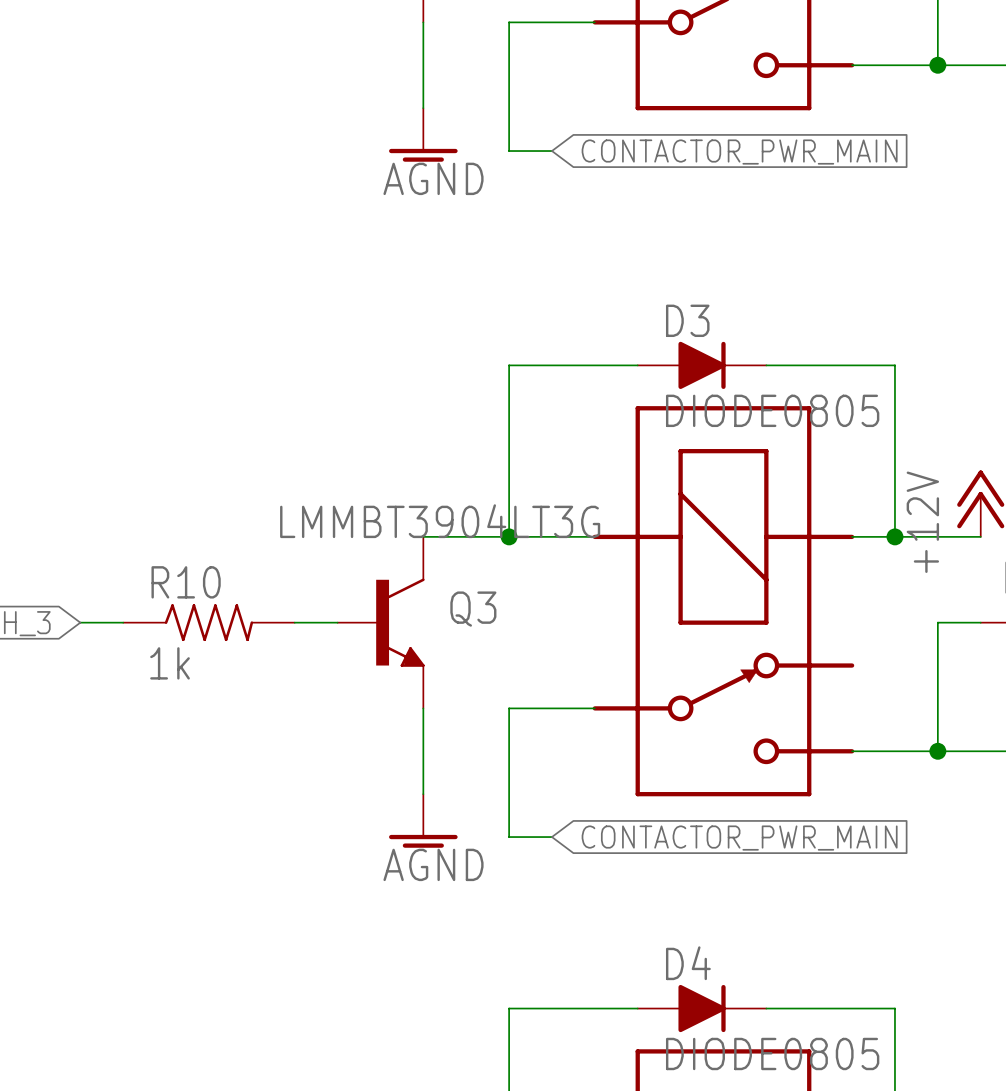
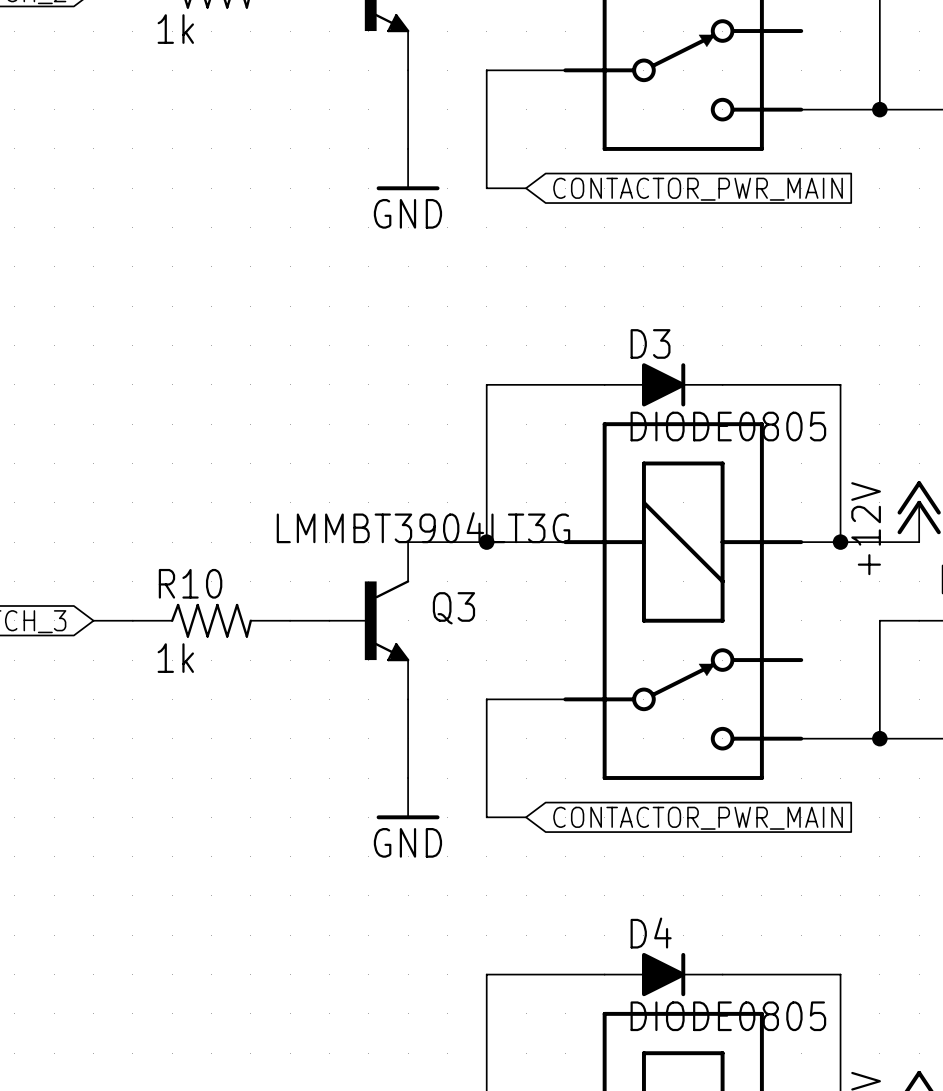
power symbol: AGND (423, 134) -> GND (408, 169)
power symbol: AGND (423, 820) -> GND (408, 798)

